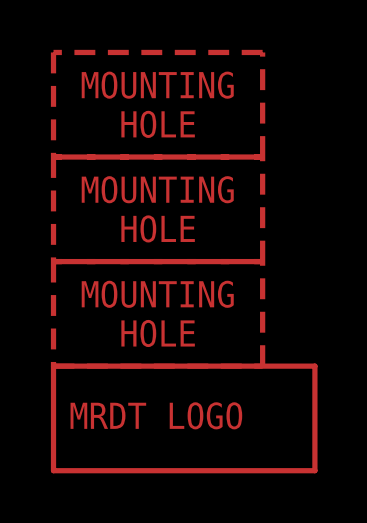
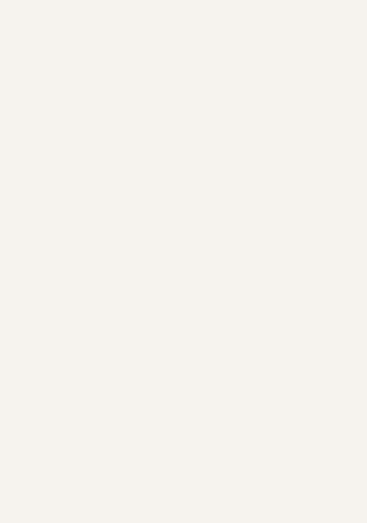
part: (158, 104) -> none
part: (158, 209) -> none
part: (158, 313) -> none
part: (184, 418) -> none

